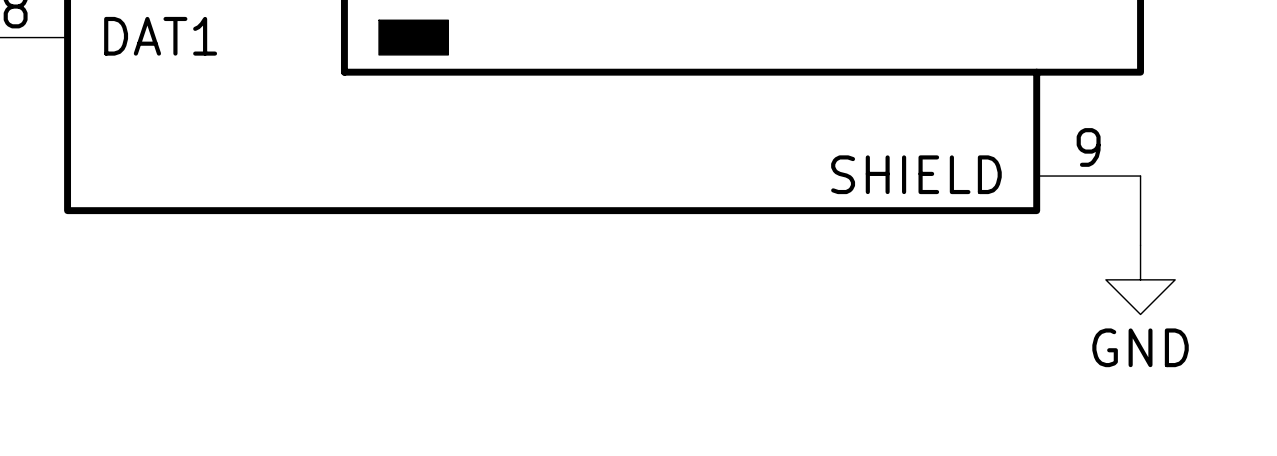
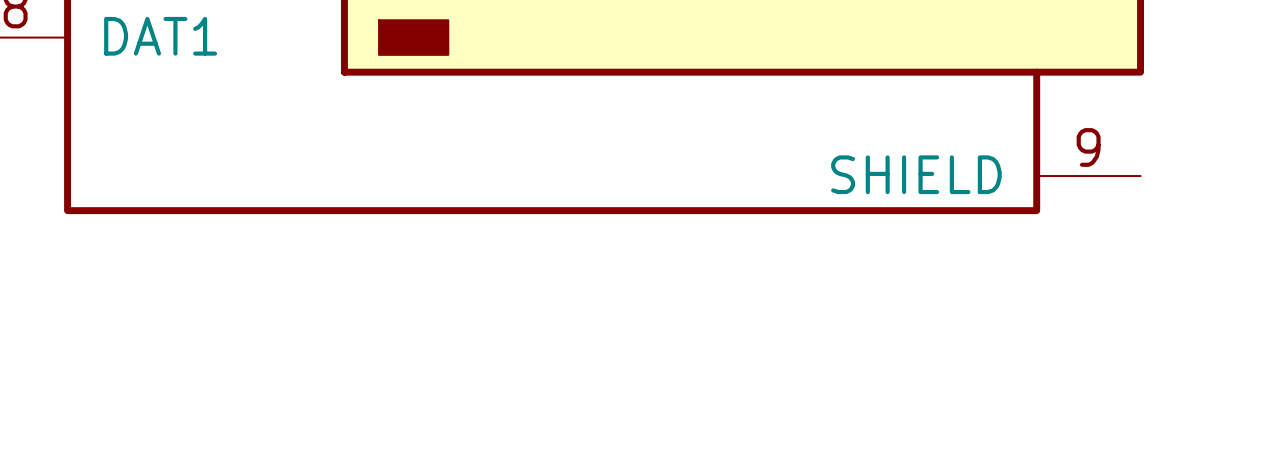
wire: (1140, 176) (1140, 245) -> none
power symbol: GND (1140, 279) -> none

